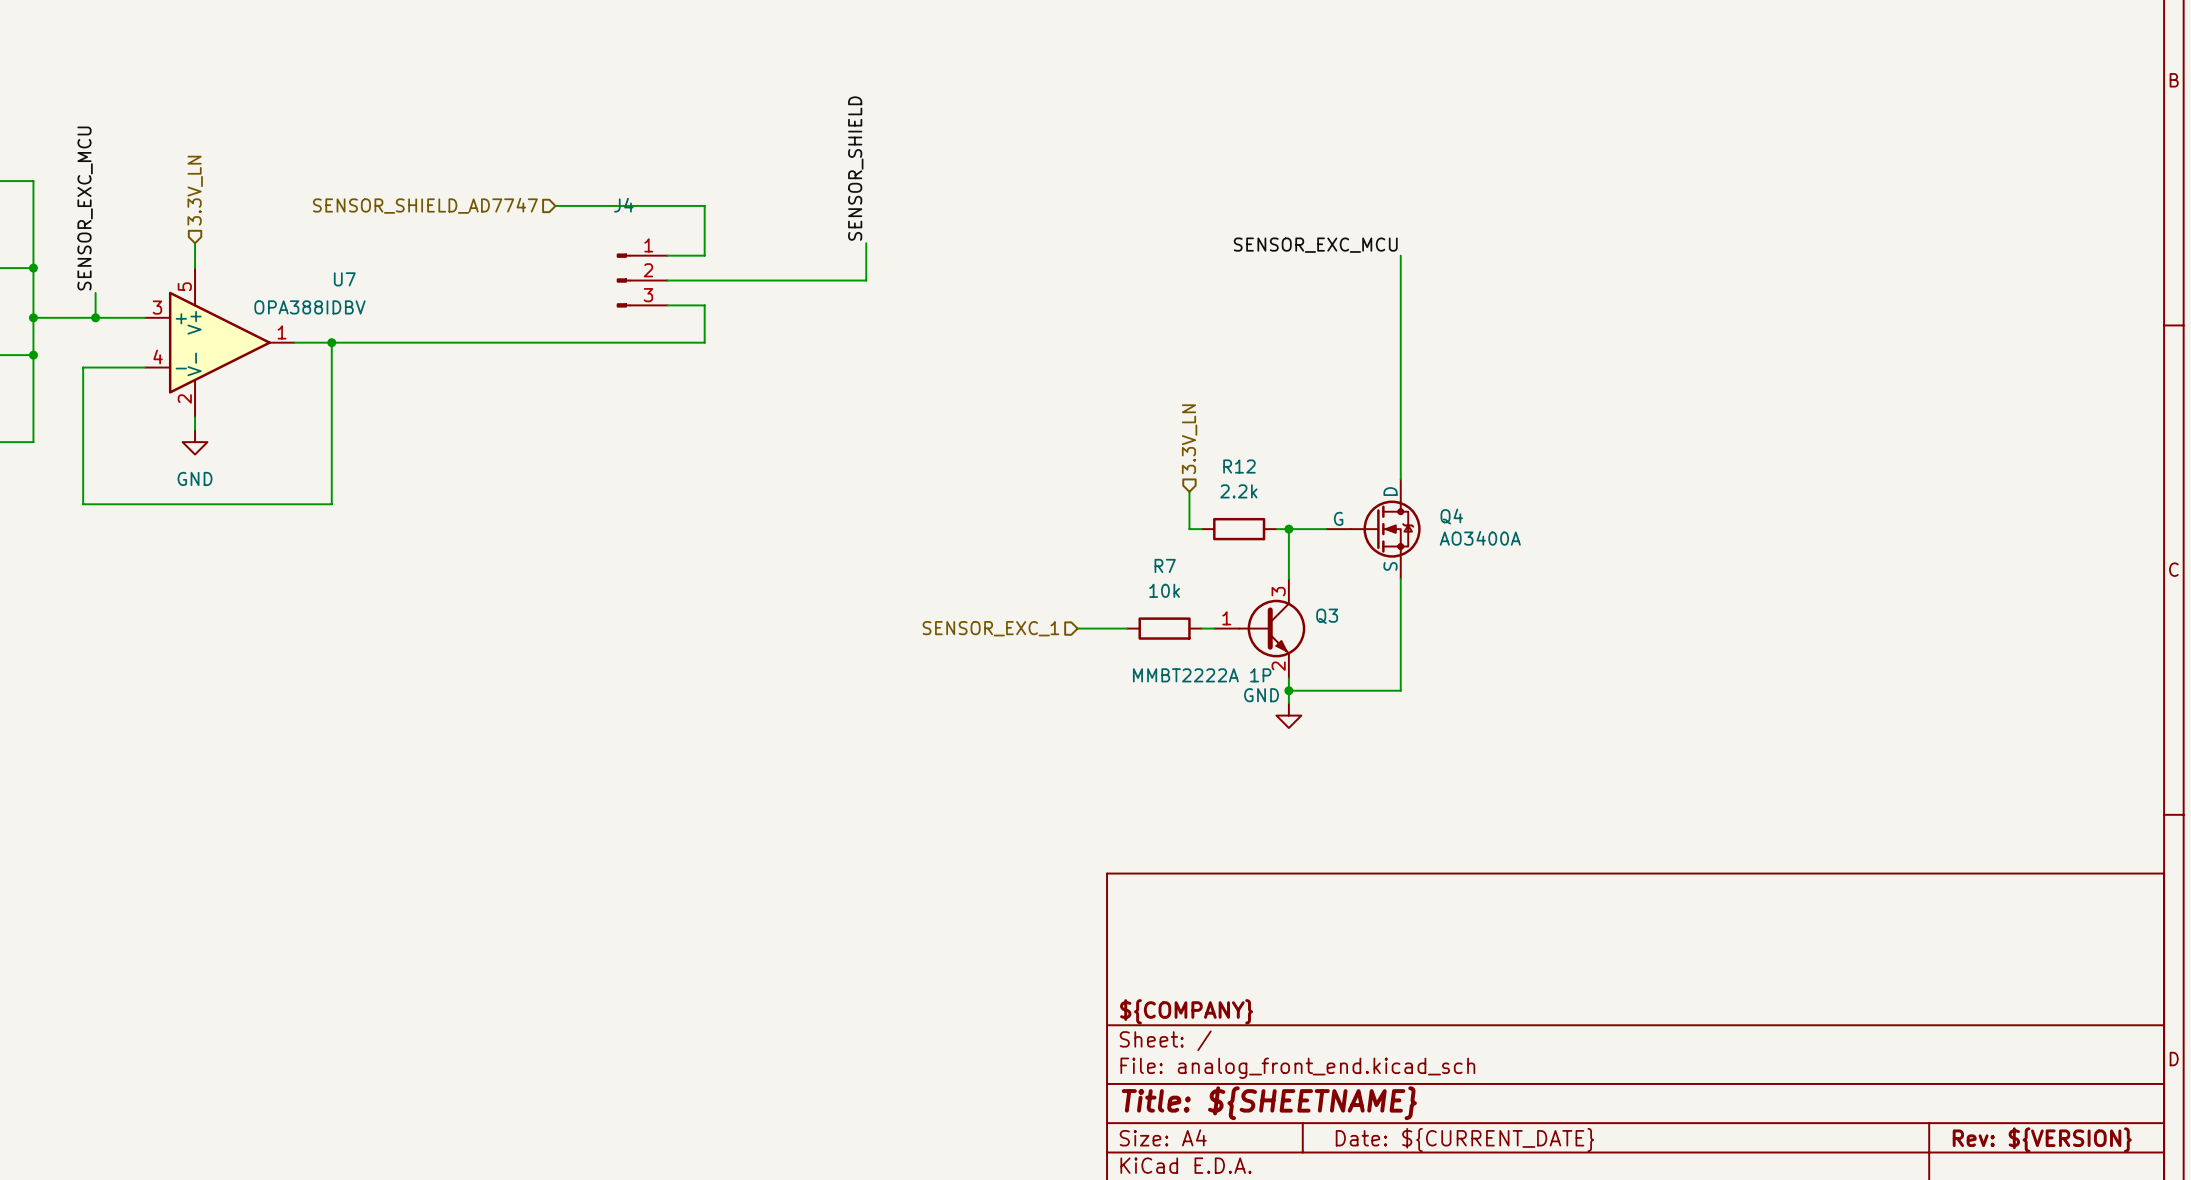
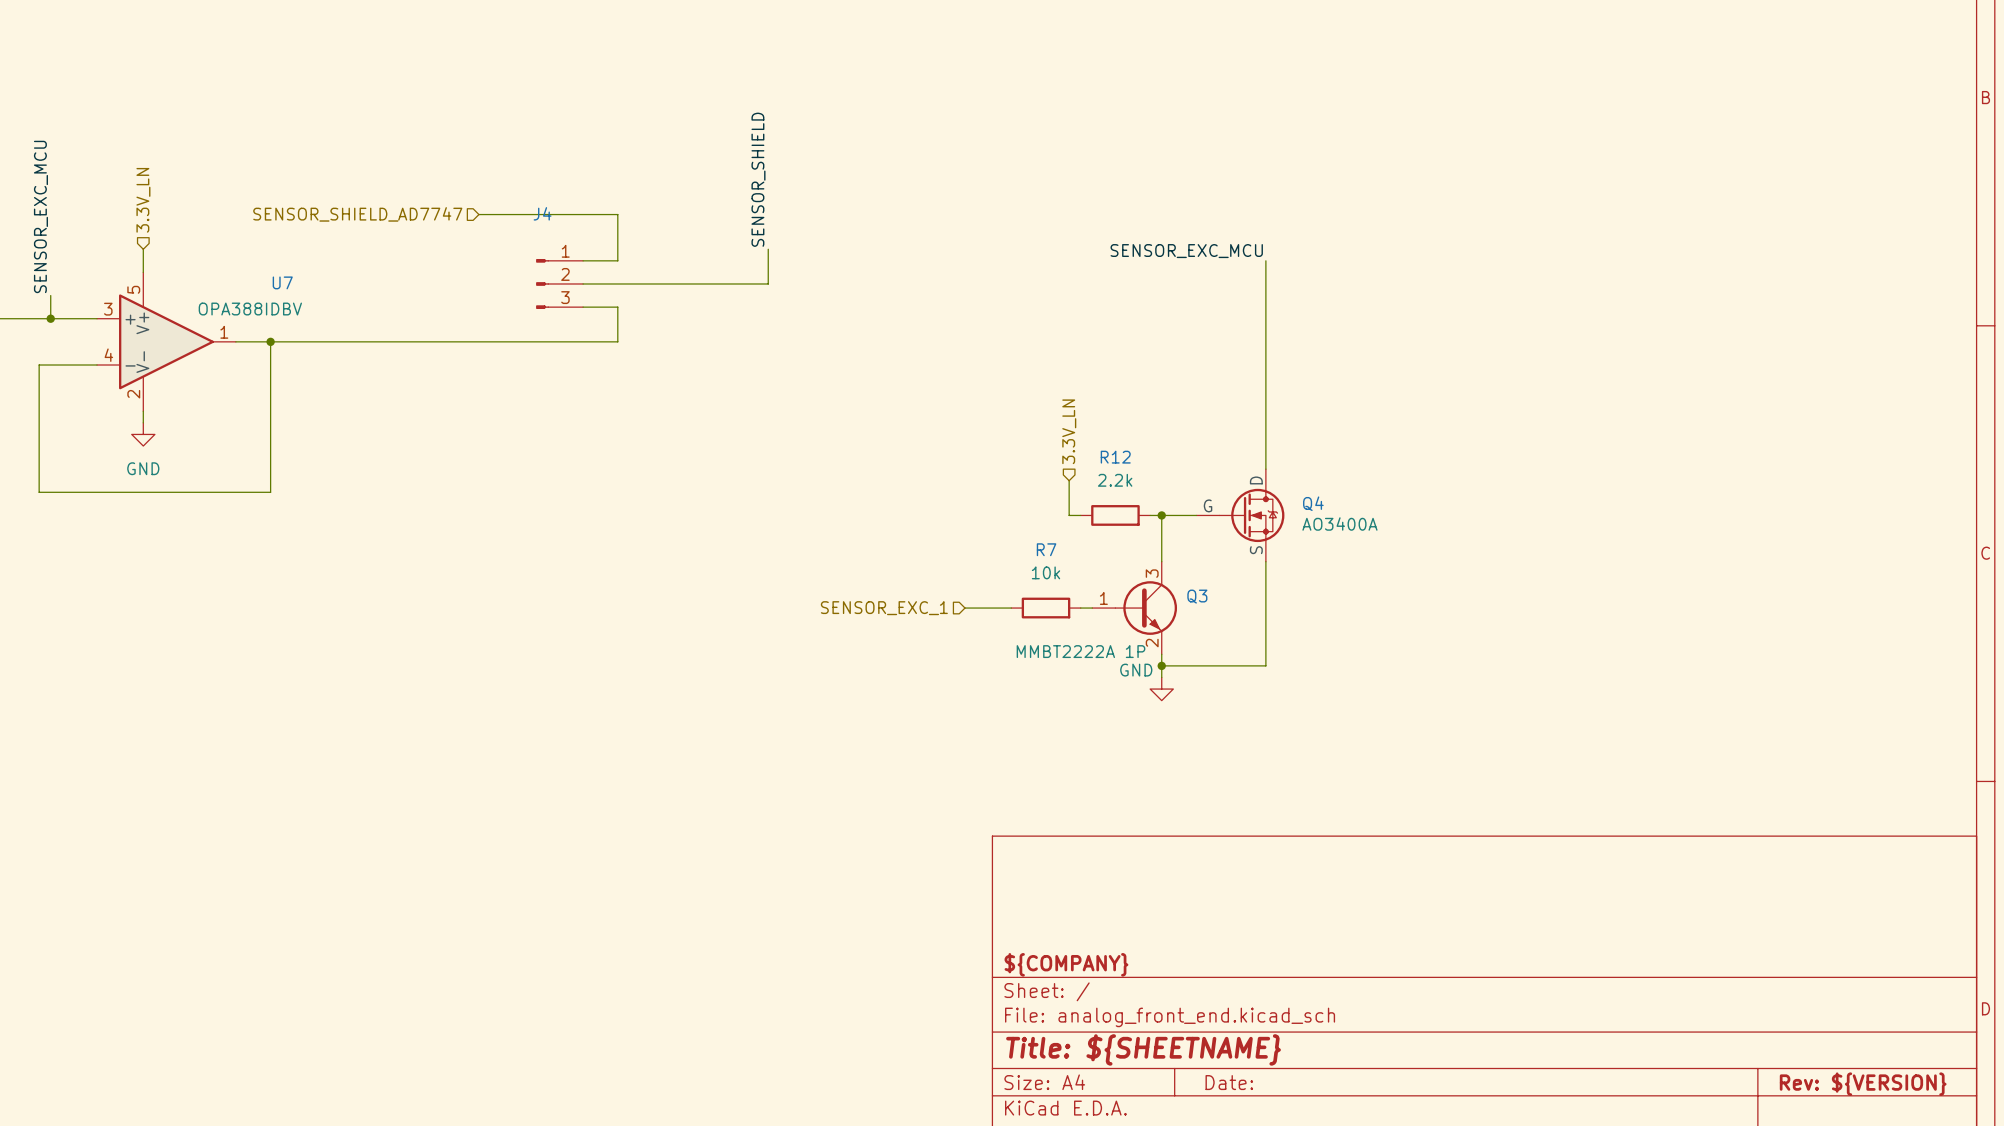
title block: Date: ${CURRENT_DATE} (1464, 1139) -> Date: (1229, 1082)

